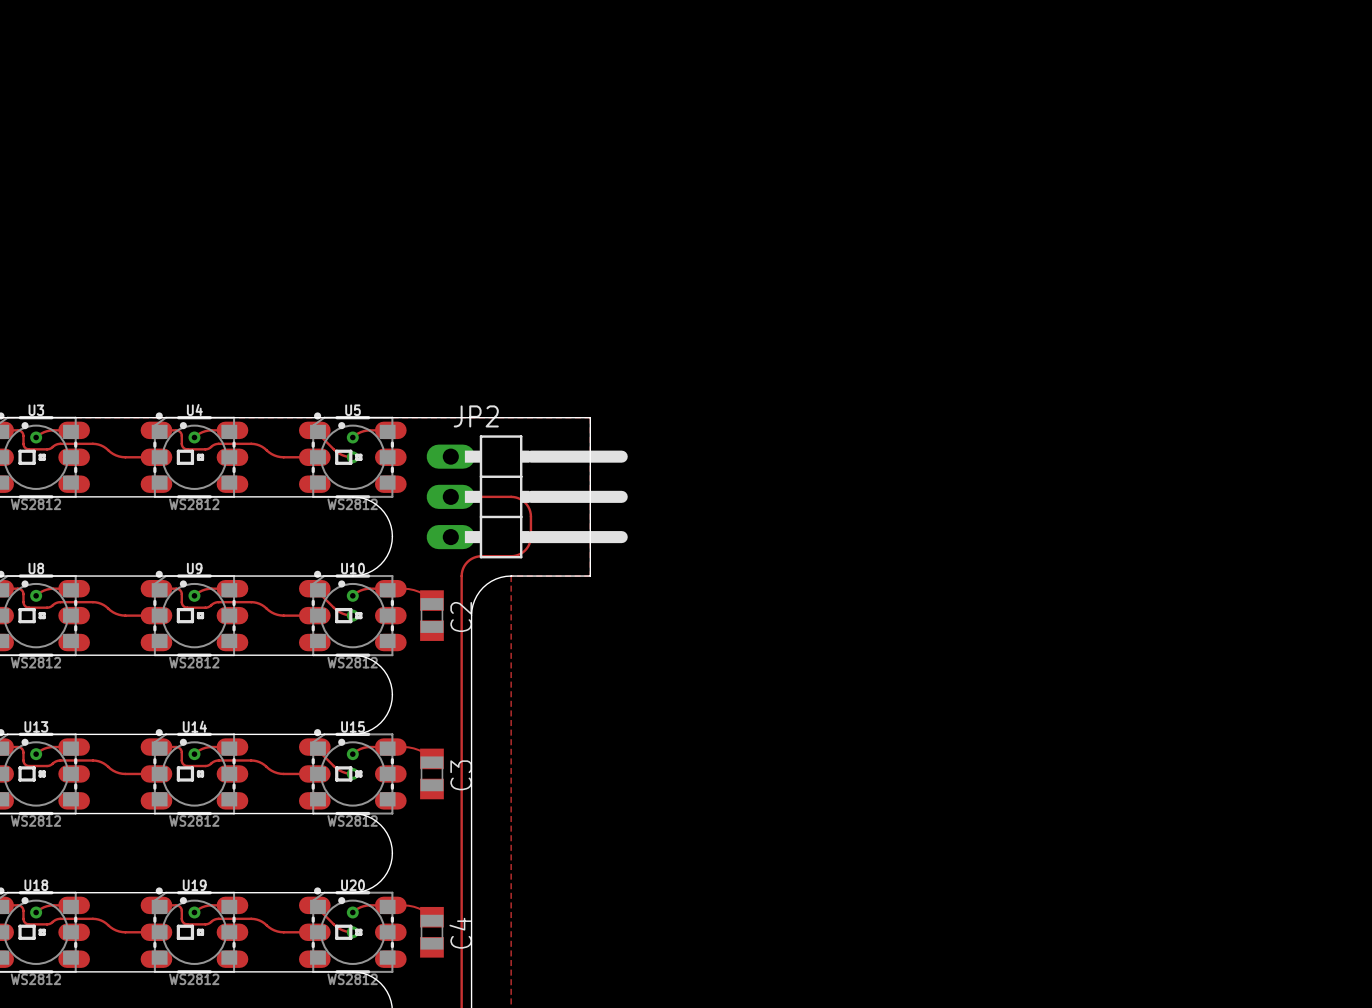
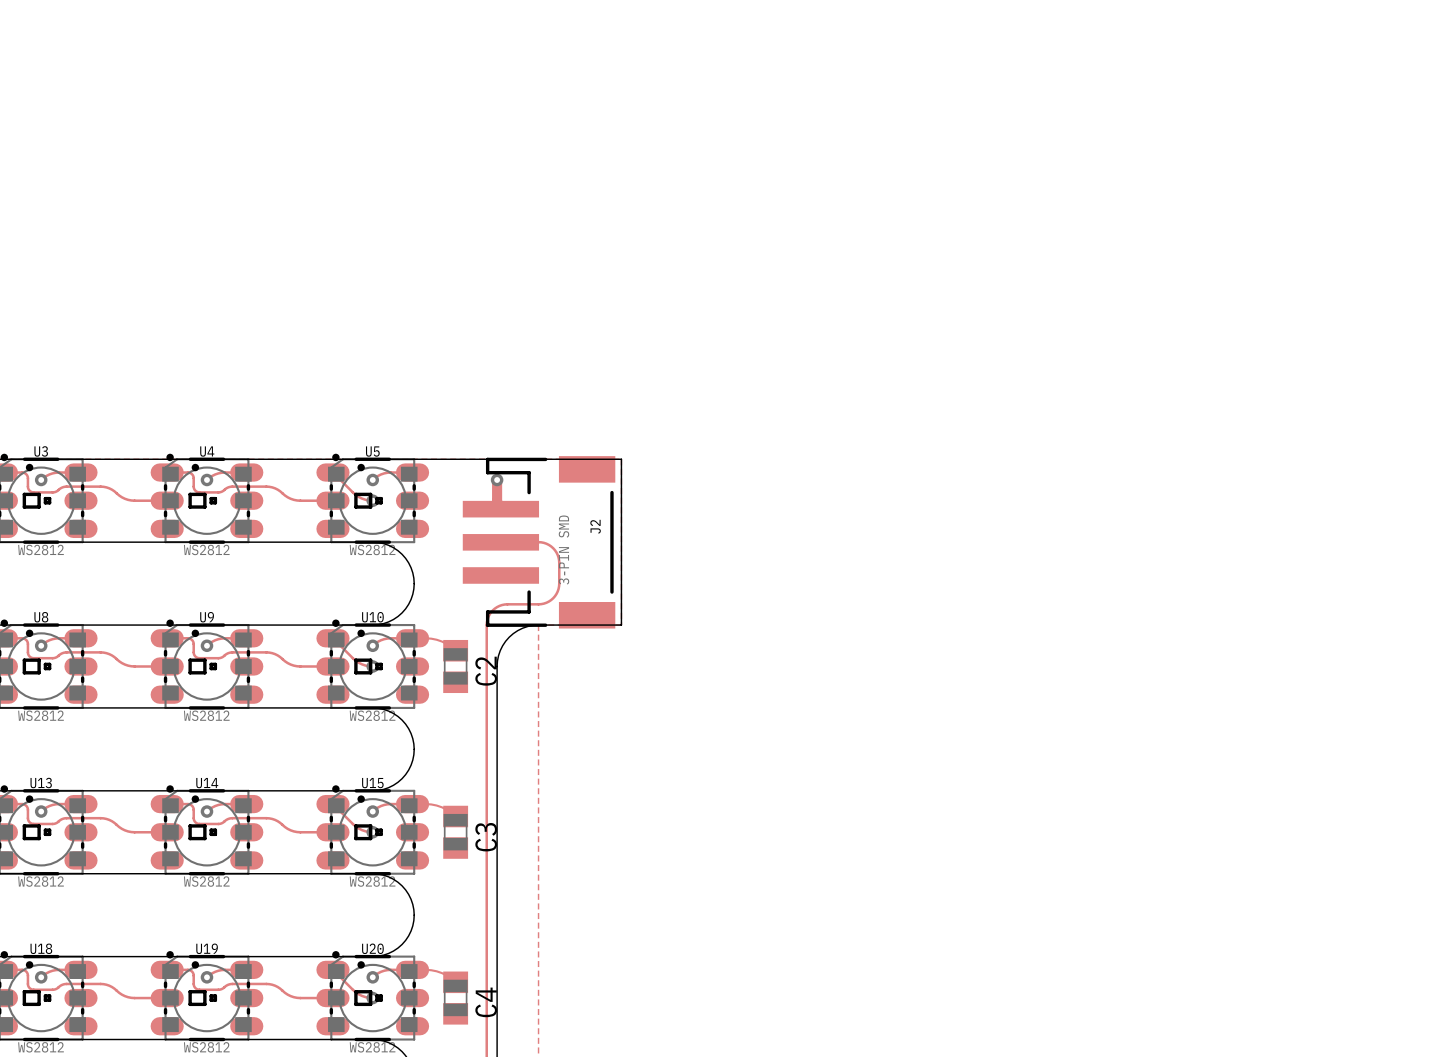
track: none -> (497, 479) (497, 502) (500, 509)
via: none -> (497, 479)
JP2: (527, 496) -> none
J2: none -> 3-PIN SMD (539, 542)

